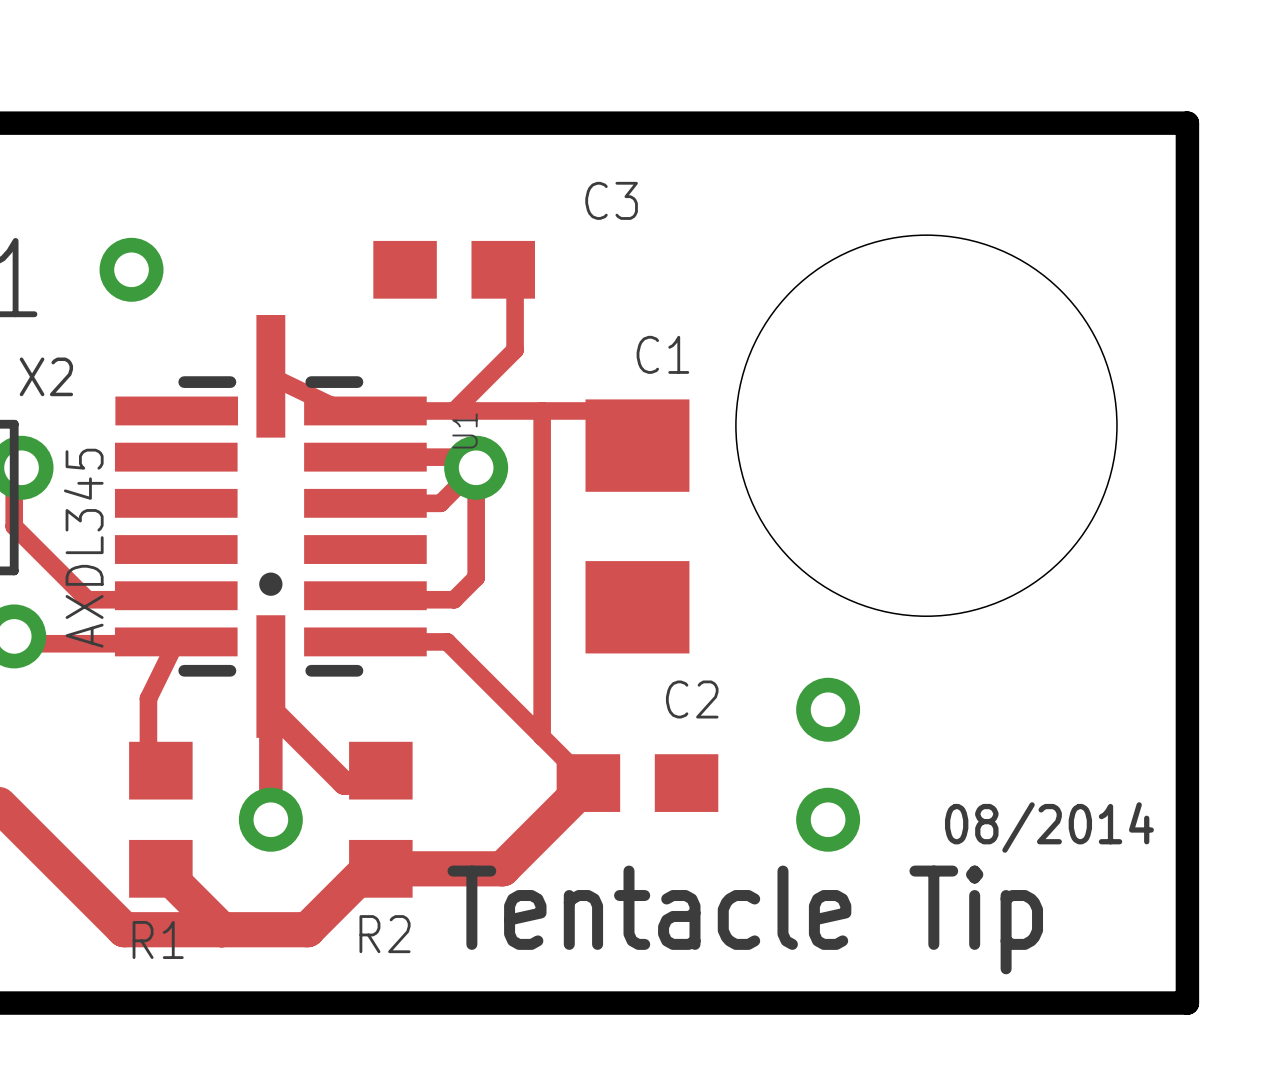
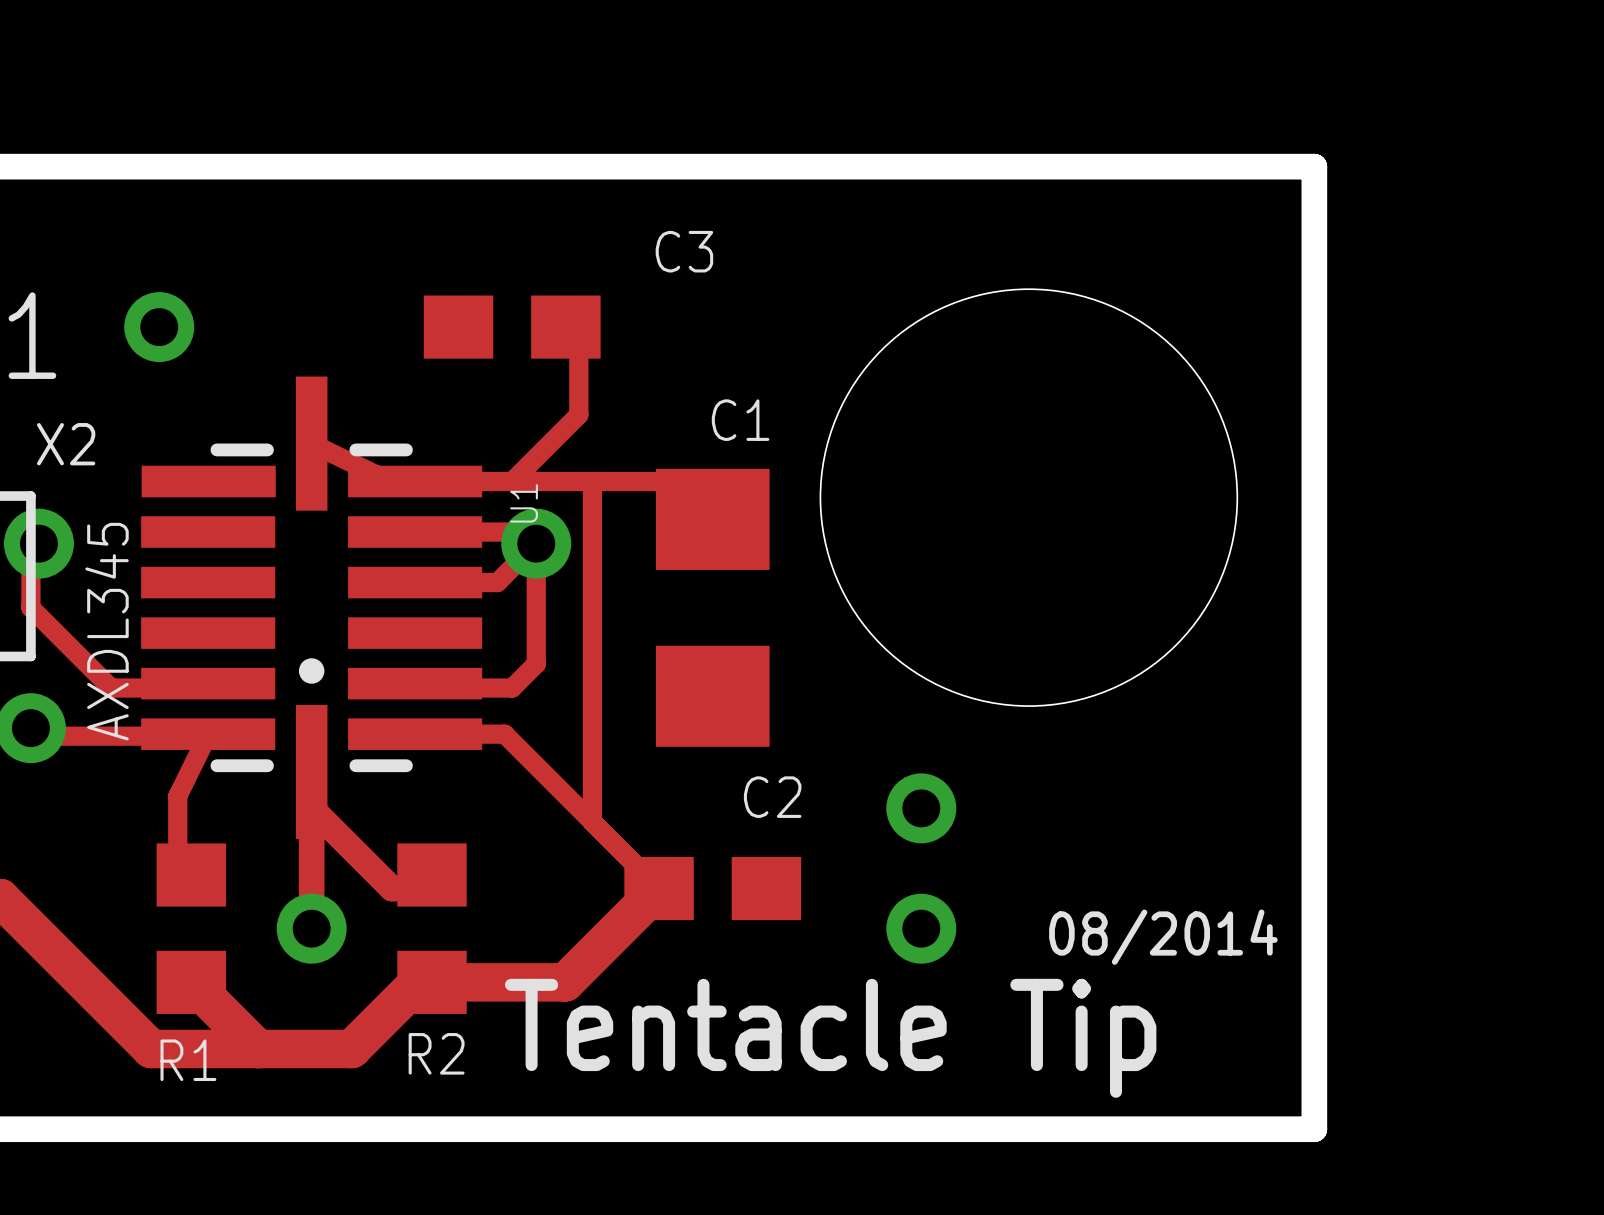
track: none -> (592, 481) (592, 821)
track: (542, 410) (542, 736) -> none

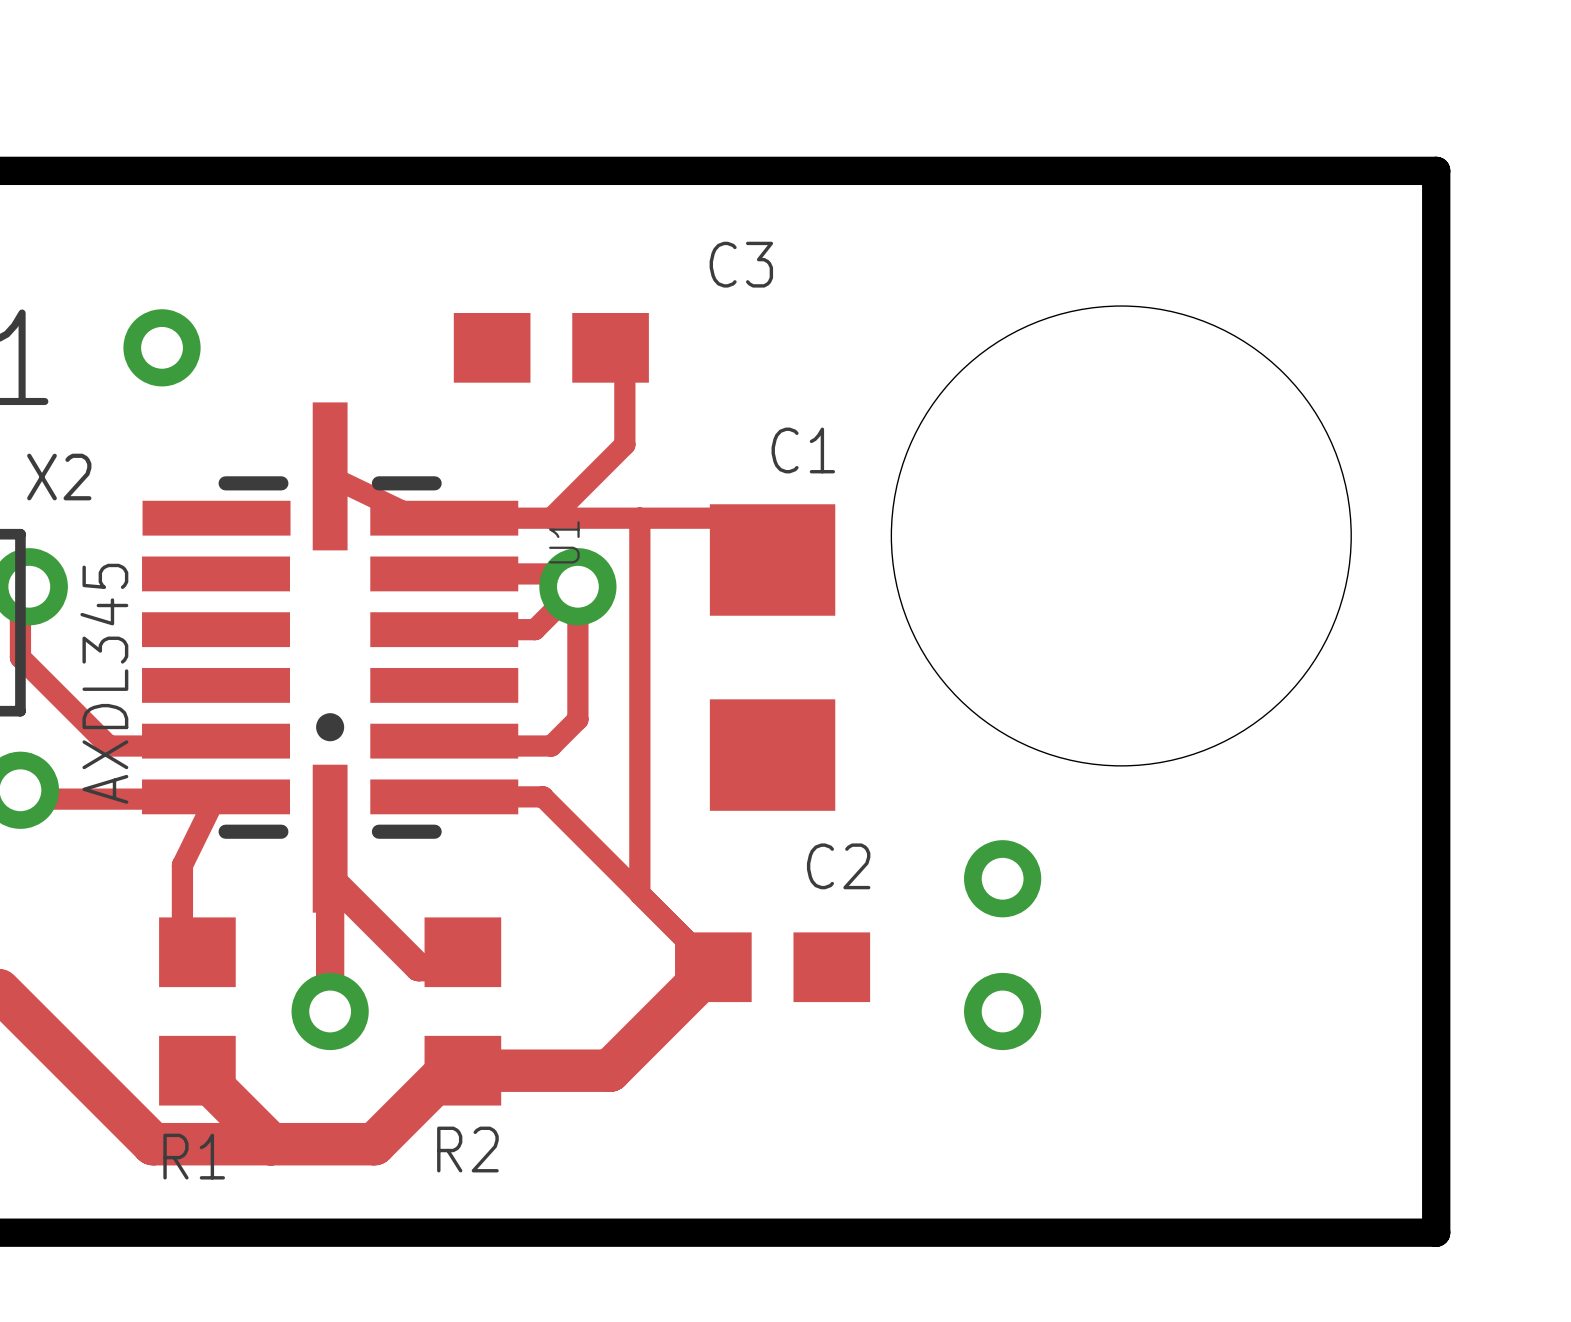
text: 08/2014 (1163, 937) -> none
text: Tentacle Tip (830, 1038) -> none

